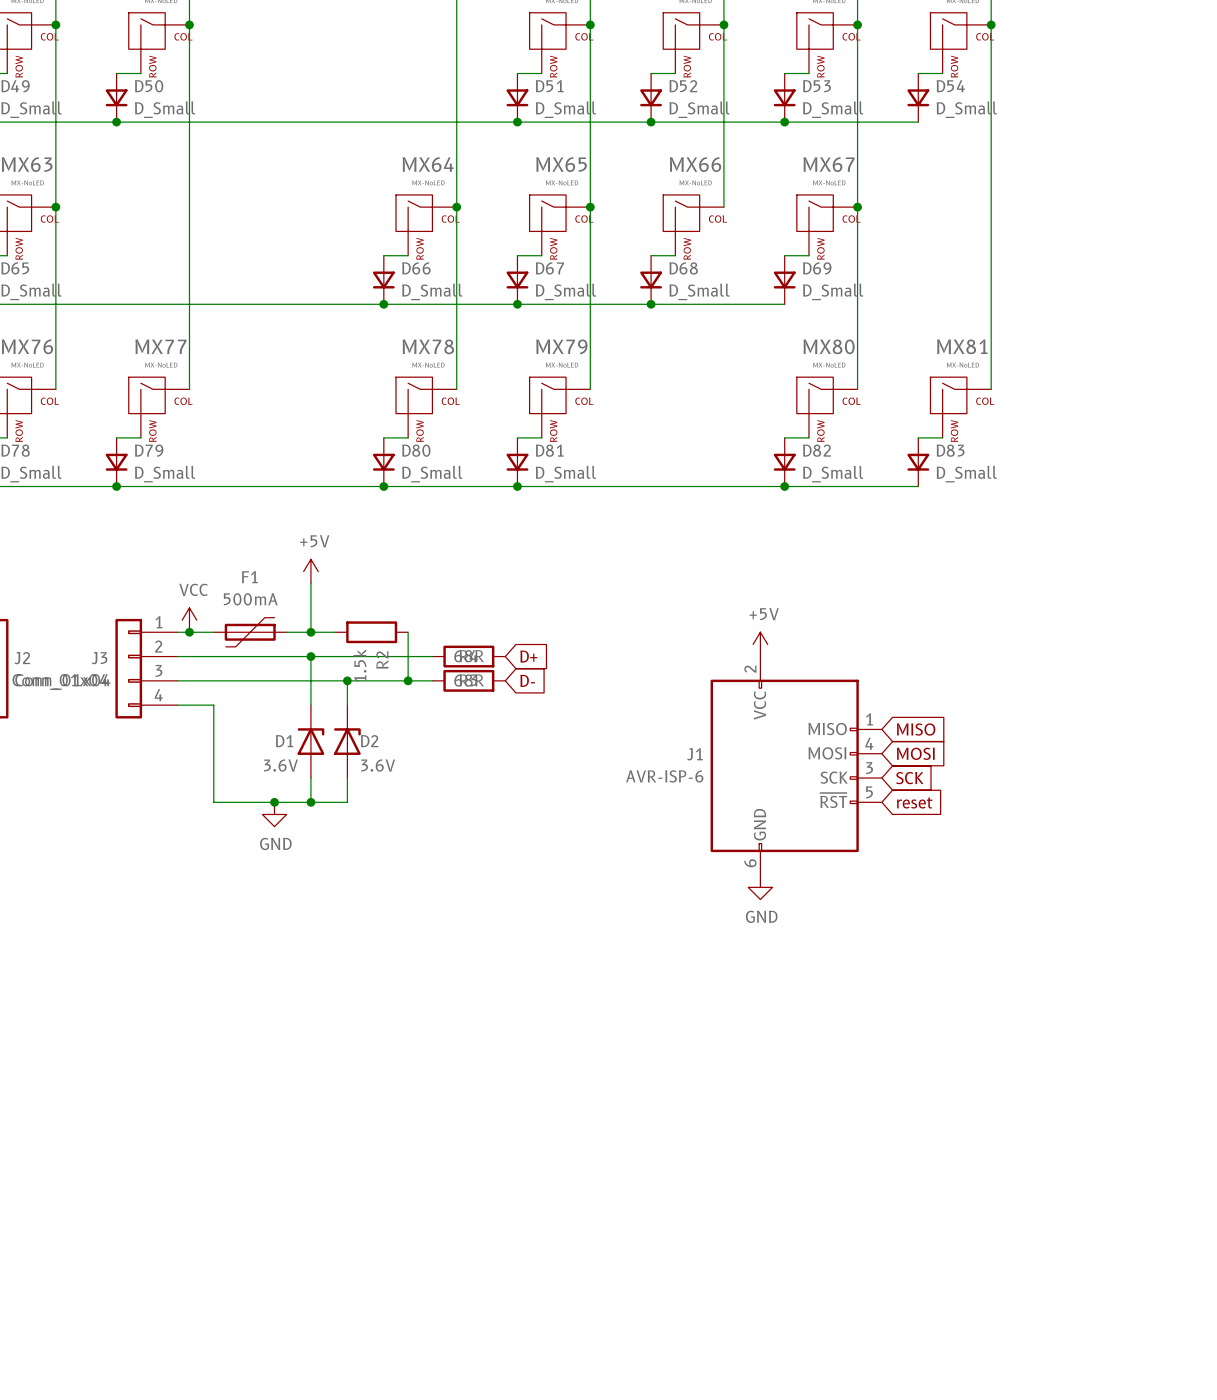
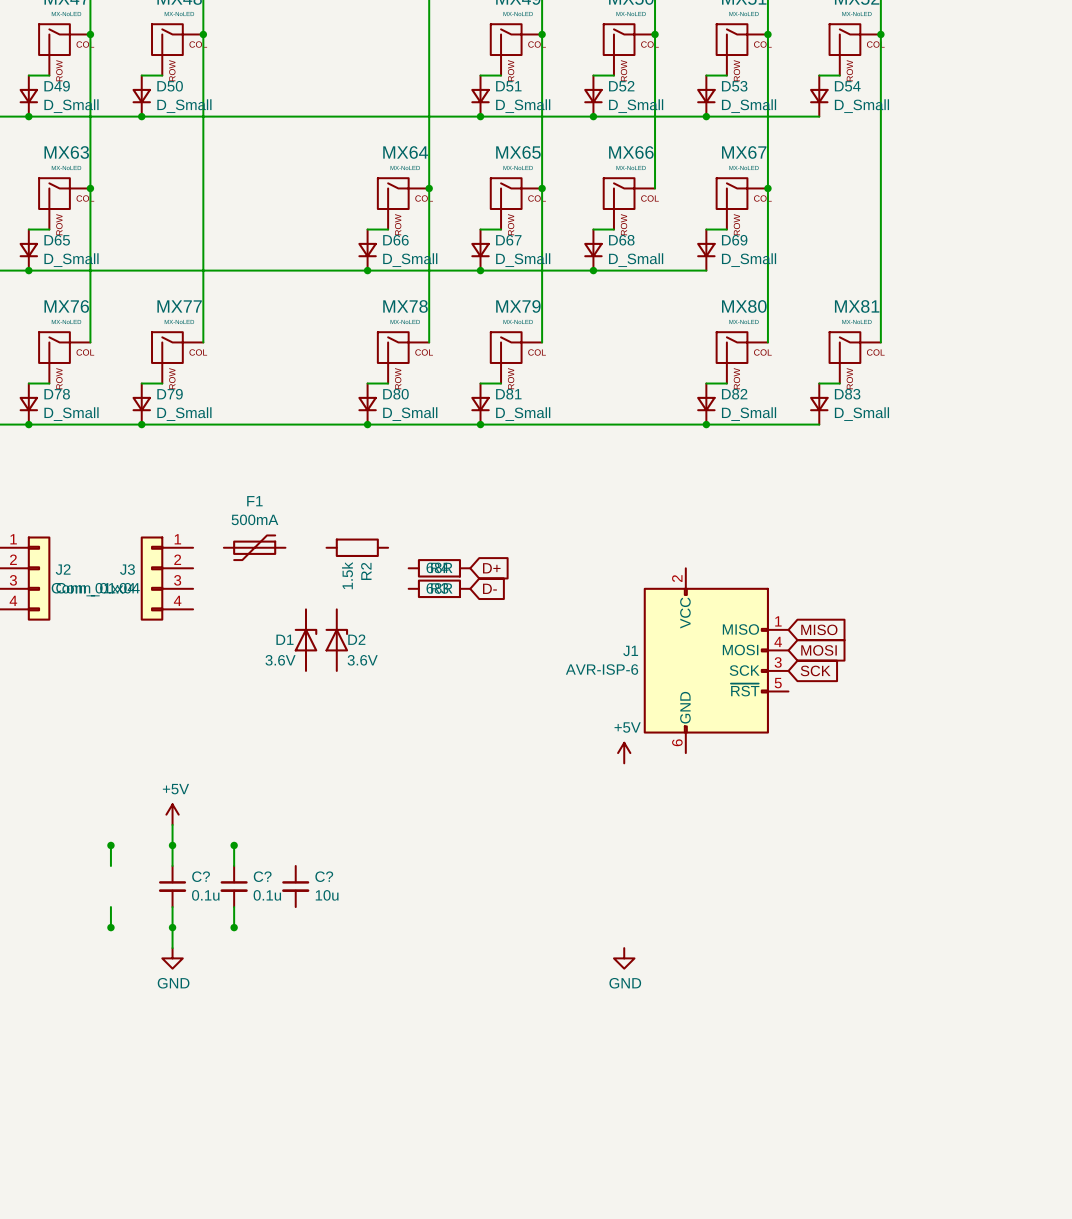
power symbol: +5V (310, 571) -> none
wire: (310, 583) (310, 632) -> none
power symbol: VCC (189, 620) -> none
wire: (177, 632) (213, 632) -> none
junction: (189, 632) -> none
wire: (286, 632) (335, 632) -> none
junction: (310, 632) -> none
wire: (408, 632) (408, 680) -> none
power symbol: +5V (760, 644) -> none
wire: (177, 656) (432, 656) -> none
wire: (310, 656) (310, 705) -> none
junction: (310, 656) -> none
wire: (177, 680) (432, 680) -> none
wire: (347, 680) (347, 705) -> none
junction: (347, 680) -> none
junction: (408, 680) -> none
wire: (177, 705) (213, 705) (213, 802) (347, 802) (347, 778) -> none
wire: (310, 778) (310, 802) -> (234, 845) (234, 865)
junction: (274, 802) -> none
junction: (310, 802) -> none
global label: reset (914, 802) -> none
power symbol: GND (274, 814) -> none
power symbol: none -> +5V (624, 753)
power symbol: GND (760, 887) -> none
power symbol: none -> +5V (172, 814)
wire: none -> (172, 824) (172, 865)
wire: none -> (110, 845) (110, 865)
junction: none -> (110, 845)
junction: none -> (172, 845)
junction: none -> (234, 845)
C?: none -> 0.1u (172, 886)
C?: none -> 0.1u (234, 886)
C?: none -> 10u (295, 886)
wire: none -> (110, 907) (110, 927)
wire: none -> (172, 907) (172, 948)
wire: none -> (234, 907) (234, 927)
junction: none -> (110, 927)
junction: none -> (172, 927)
junction: none -> (234, 927)
power symbol: none -> GND (172, 958)
power symbol: none -> GND (624, 958)

